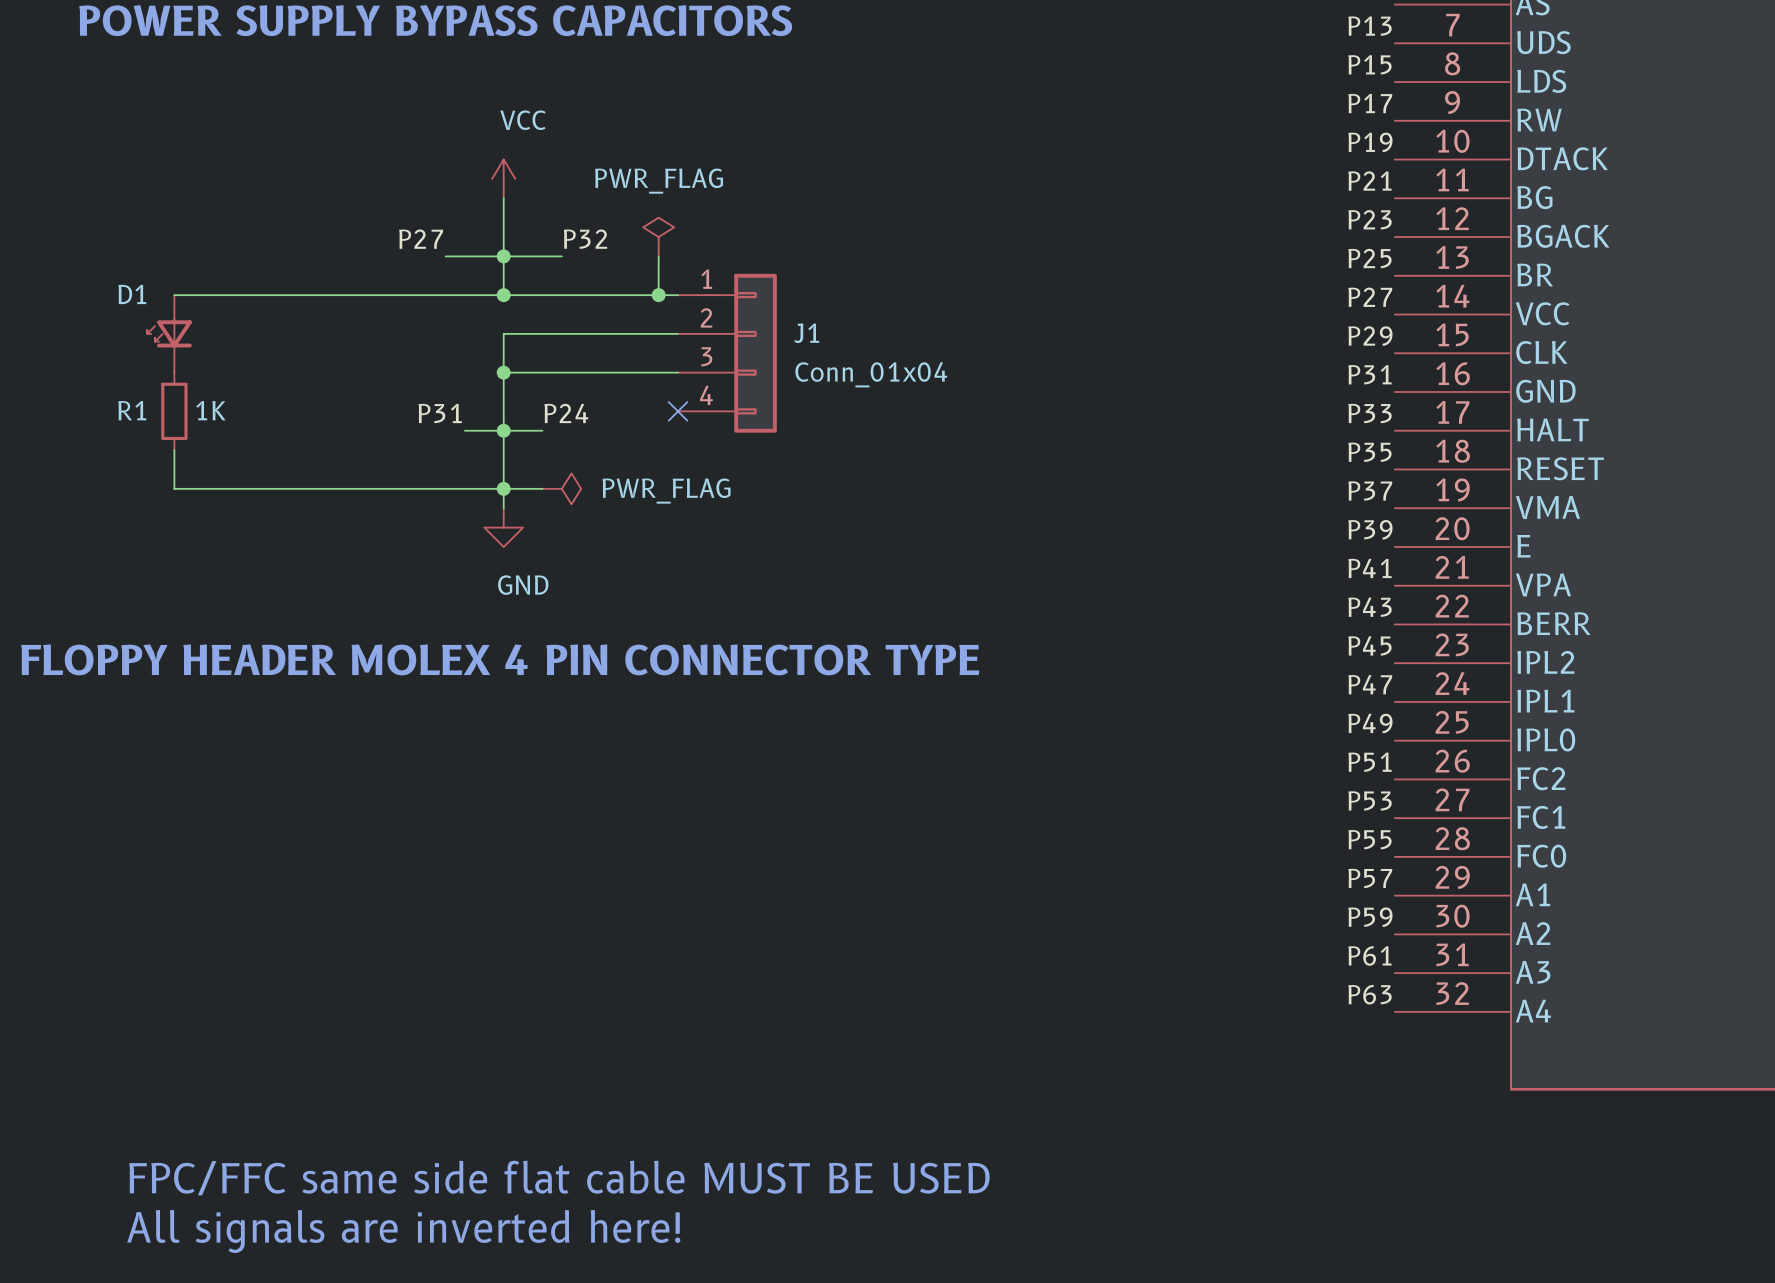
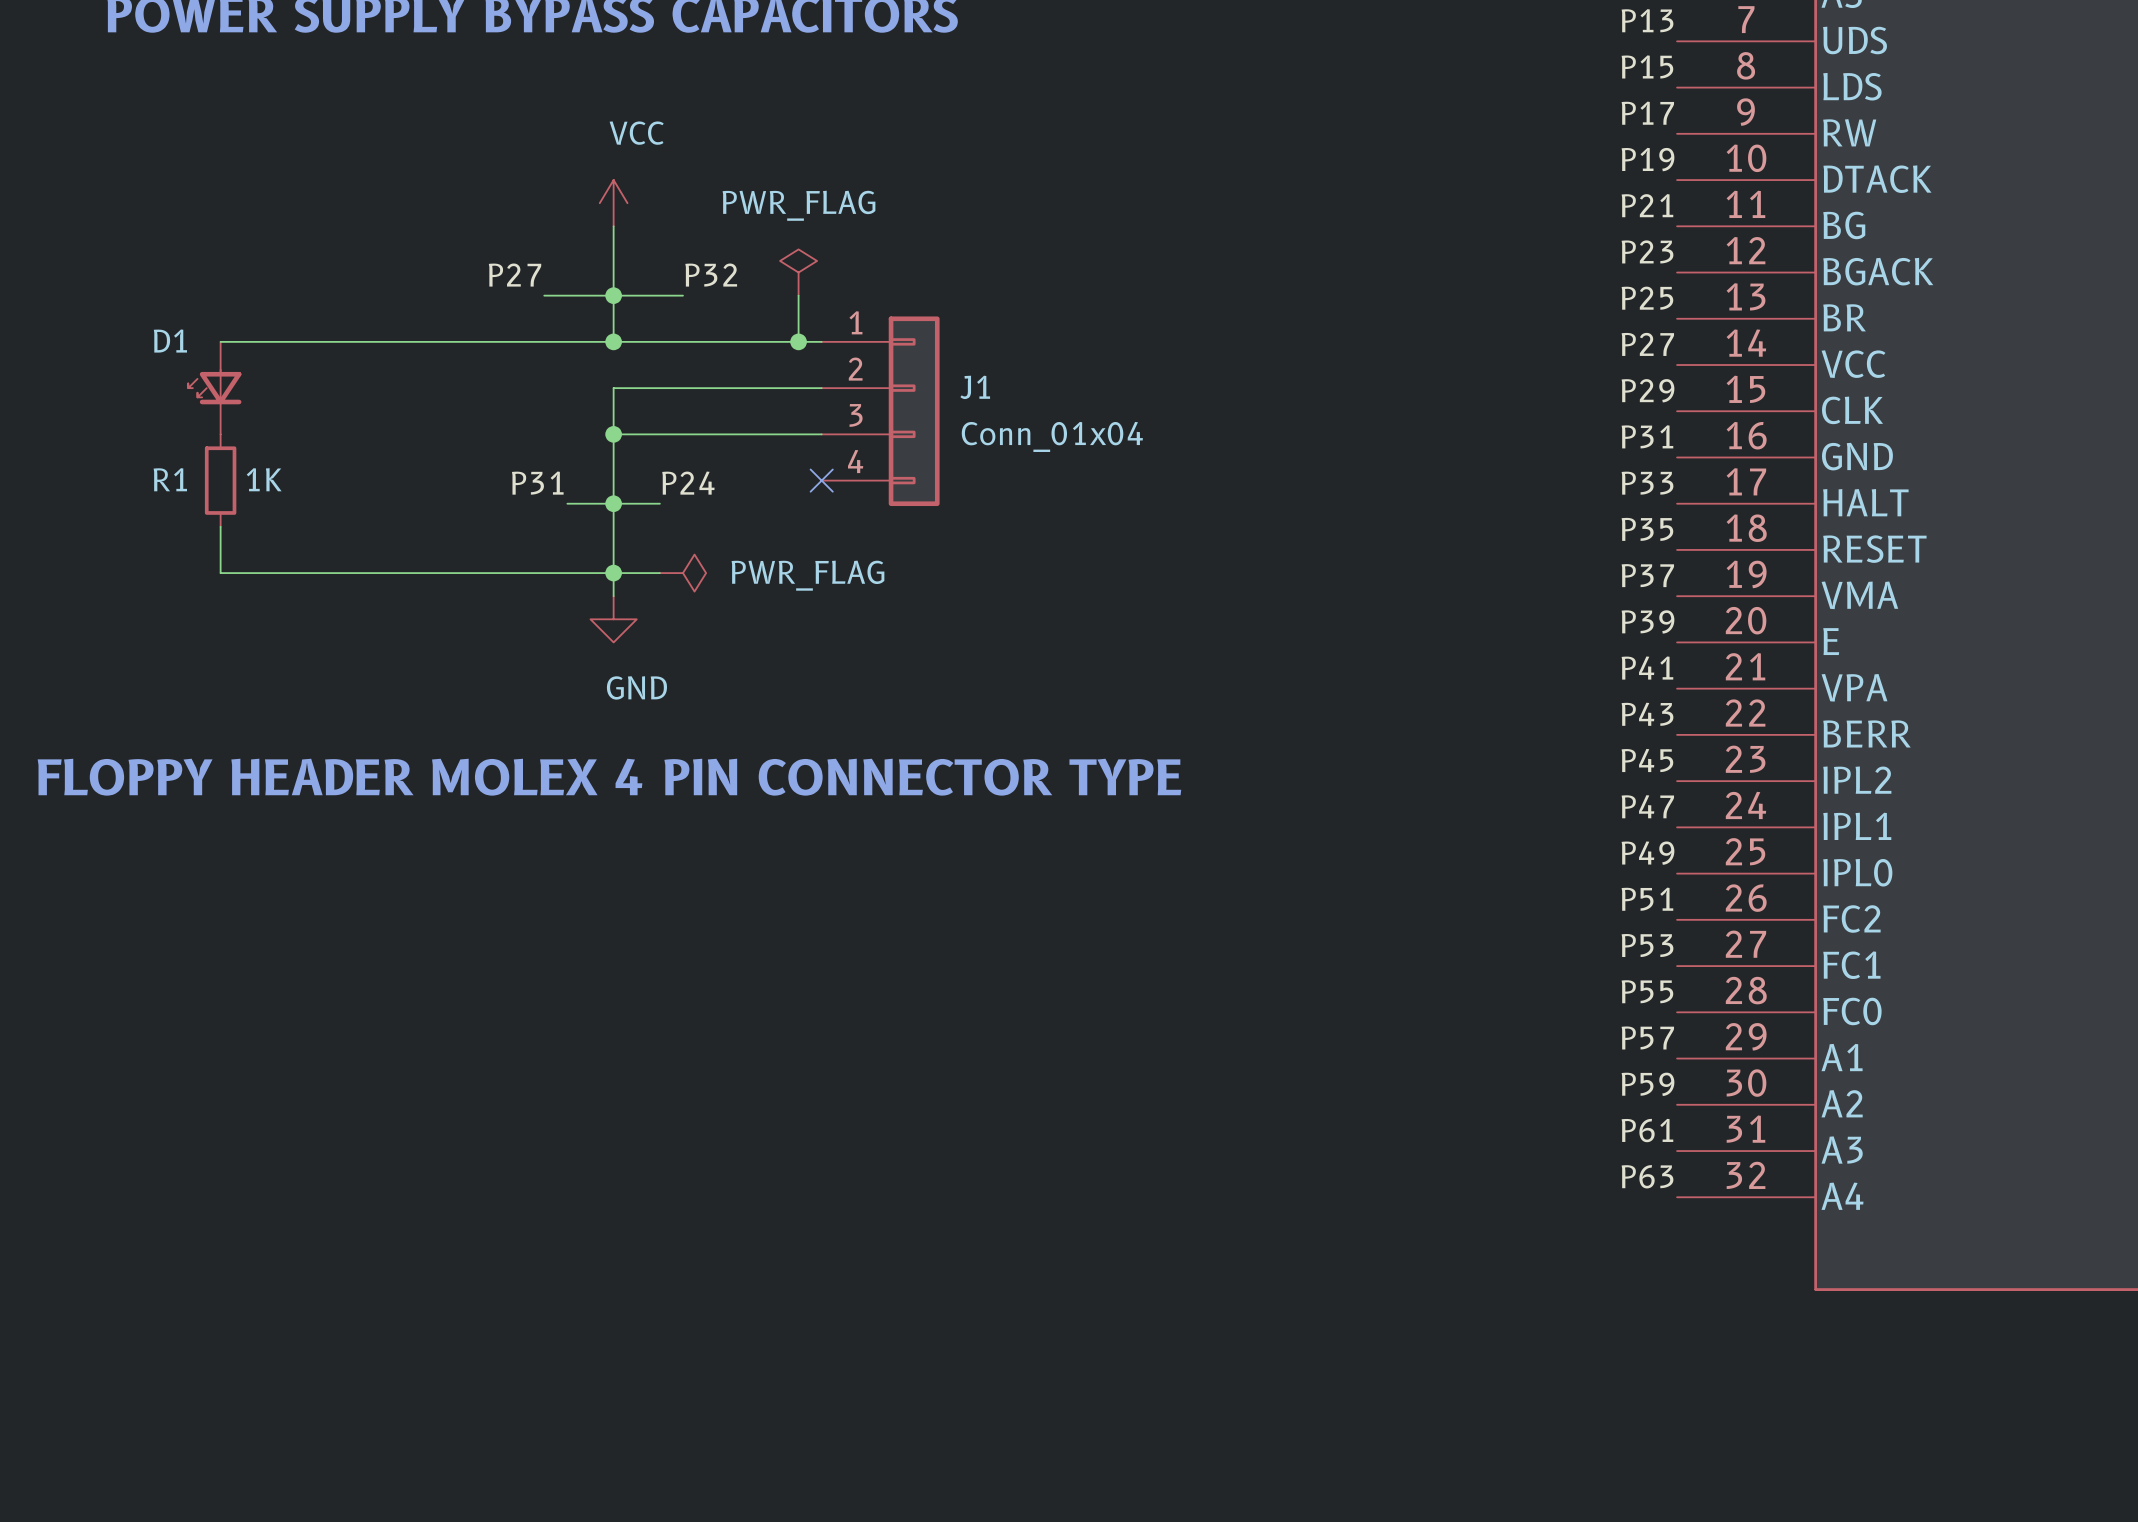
text: FPC/FFC same side flat cable MUST BE USED (559, 1178) -> none
text: All signals are inverted here! (403, 1231) -> none

